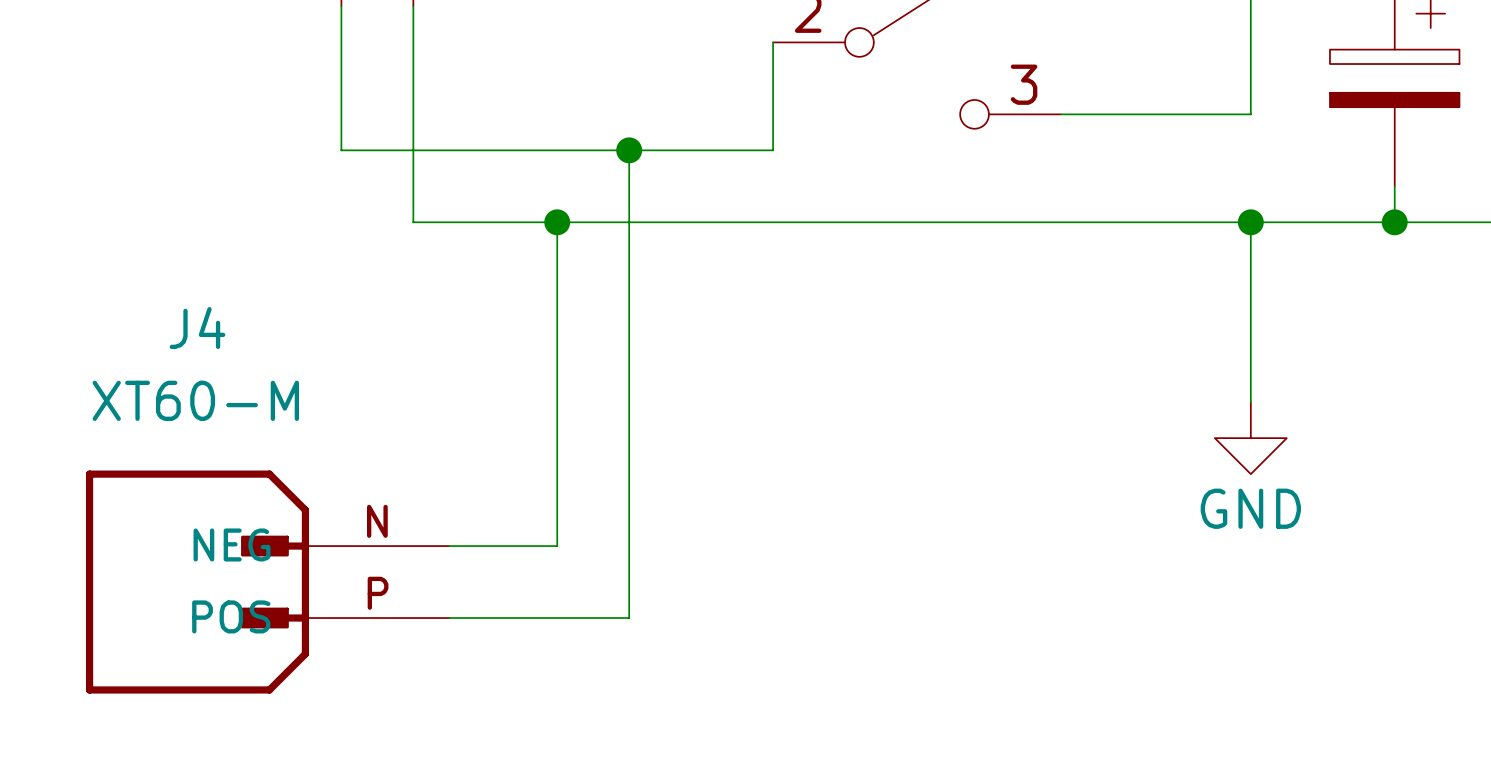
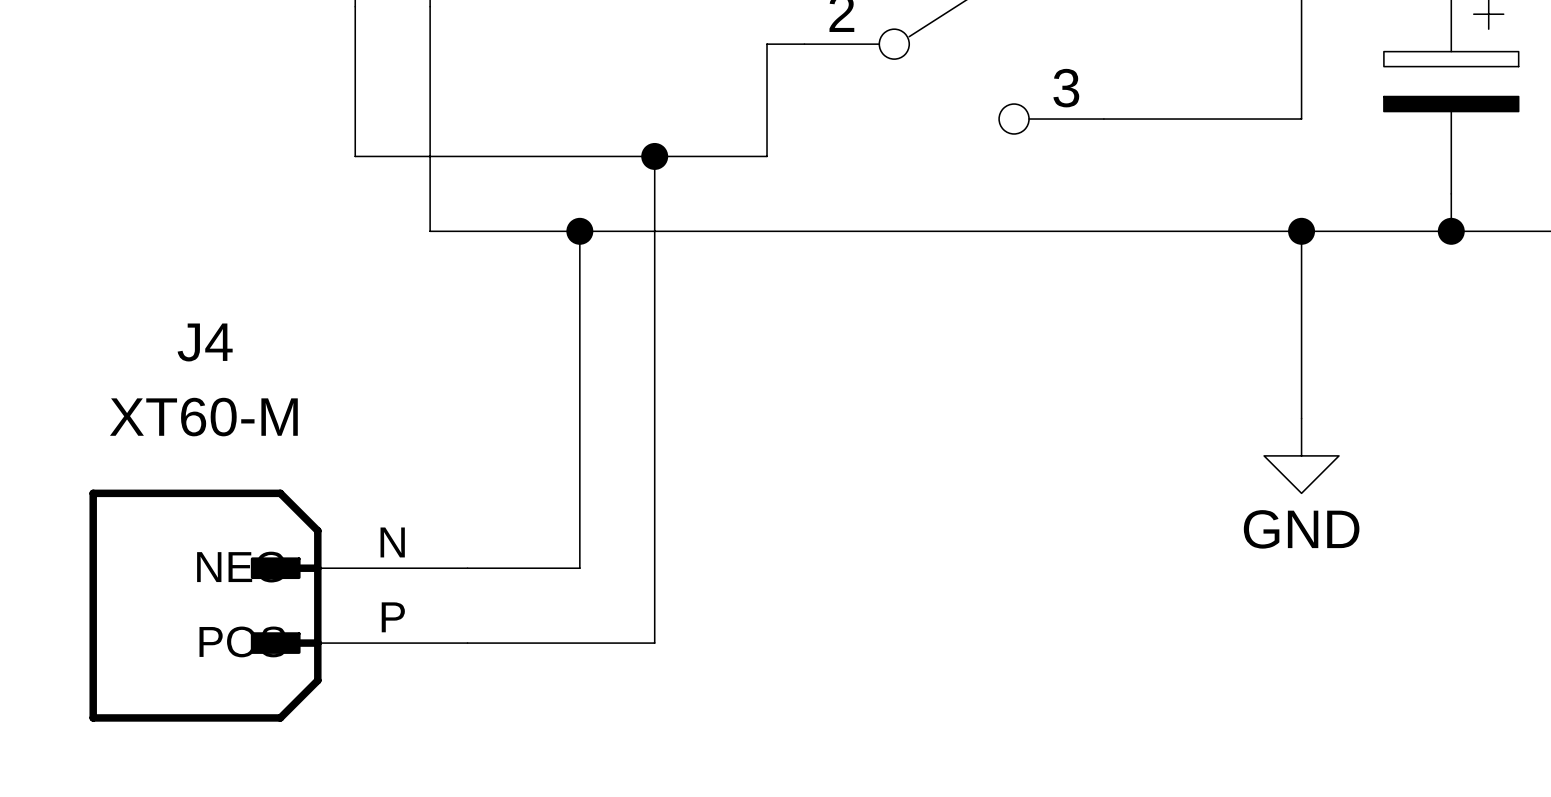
wire: (773, 42) (773, 150) (737, 150) -> (804, 44) (767, 44) (767, 156)

